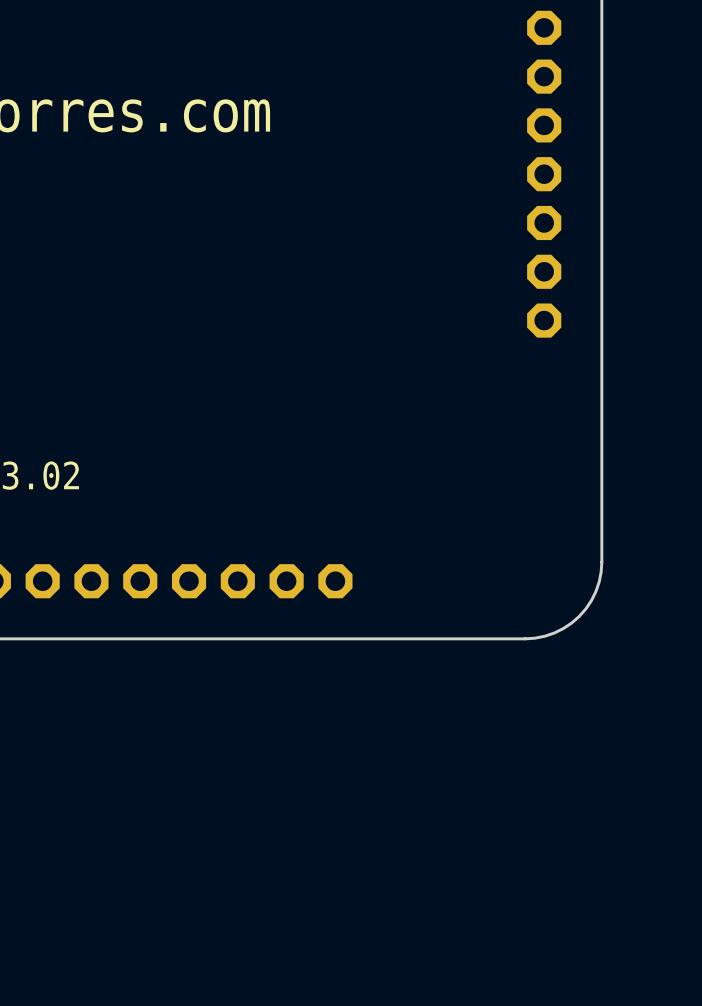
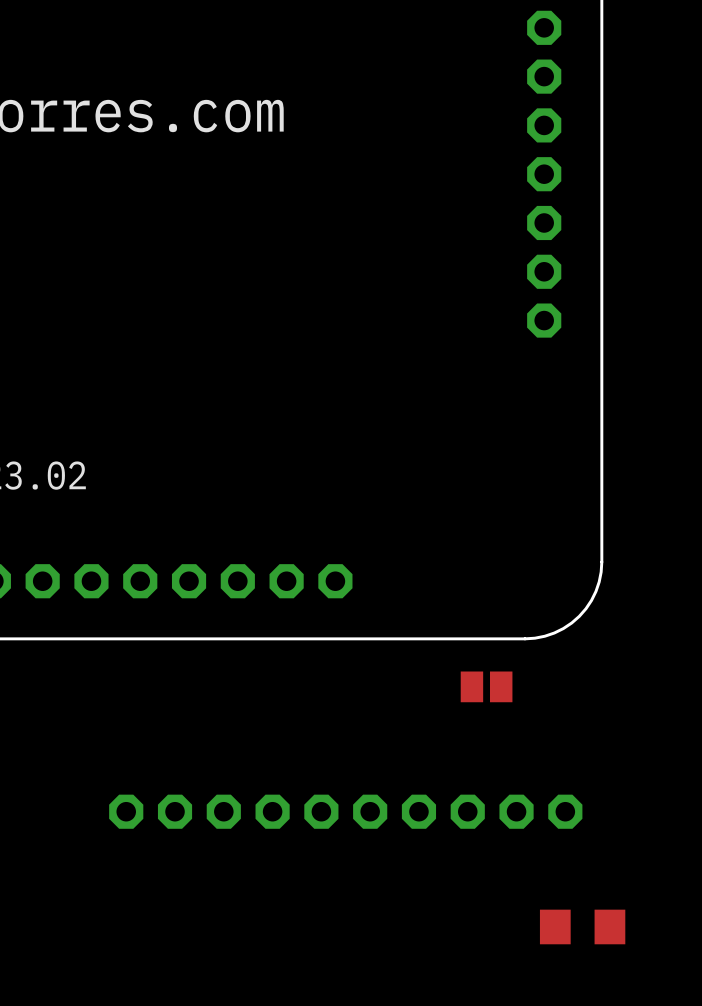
part: none -> (486, 686)
part: none -> (345, 811)
part: none -> (582, 926)

